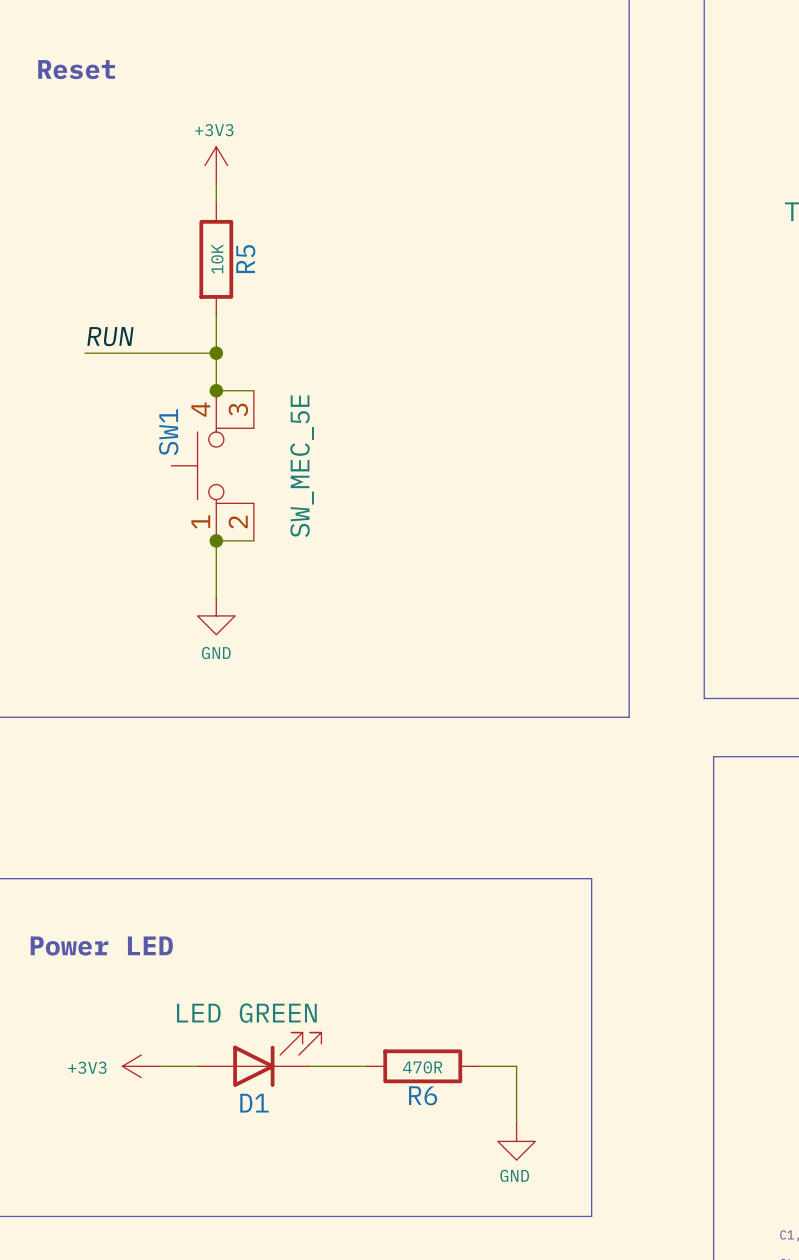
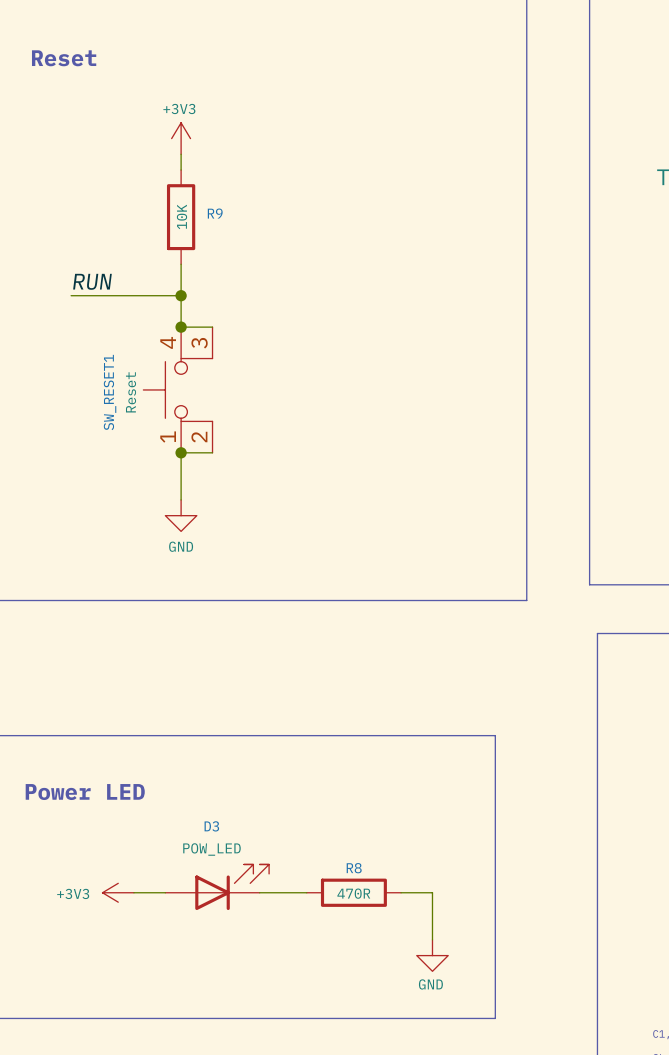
R5 name: R5 (245, 259) -> R9 (215, 213)
SW1 name: SW1 (168, 432) -> SW_RESET1 (110, 392)
SW1 value: SW_MEC_5E (302, 466) -> Reset (131, 392)
D1 value: LED GREEN (246, 1013) -> POW_LED (211, 849)
R6 name: R6 (423, 1095) -> R8 (354, 868)
D1 name: D1 (254, 1103) -> D3 (211, 826)

